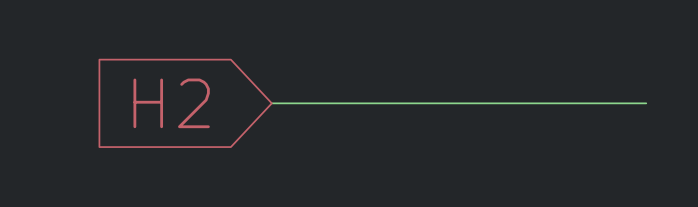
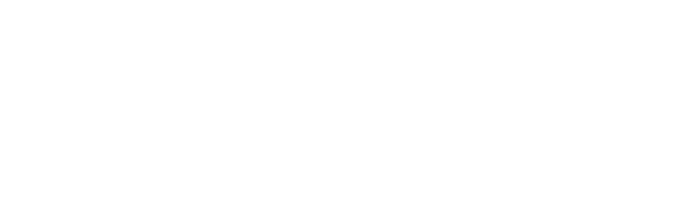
global label: H2 (171, 103) -> none
wire: (271, 103) (646, 103) -> none

